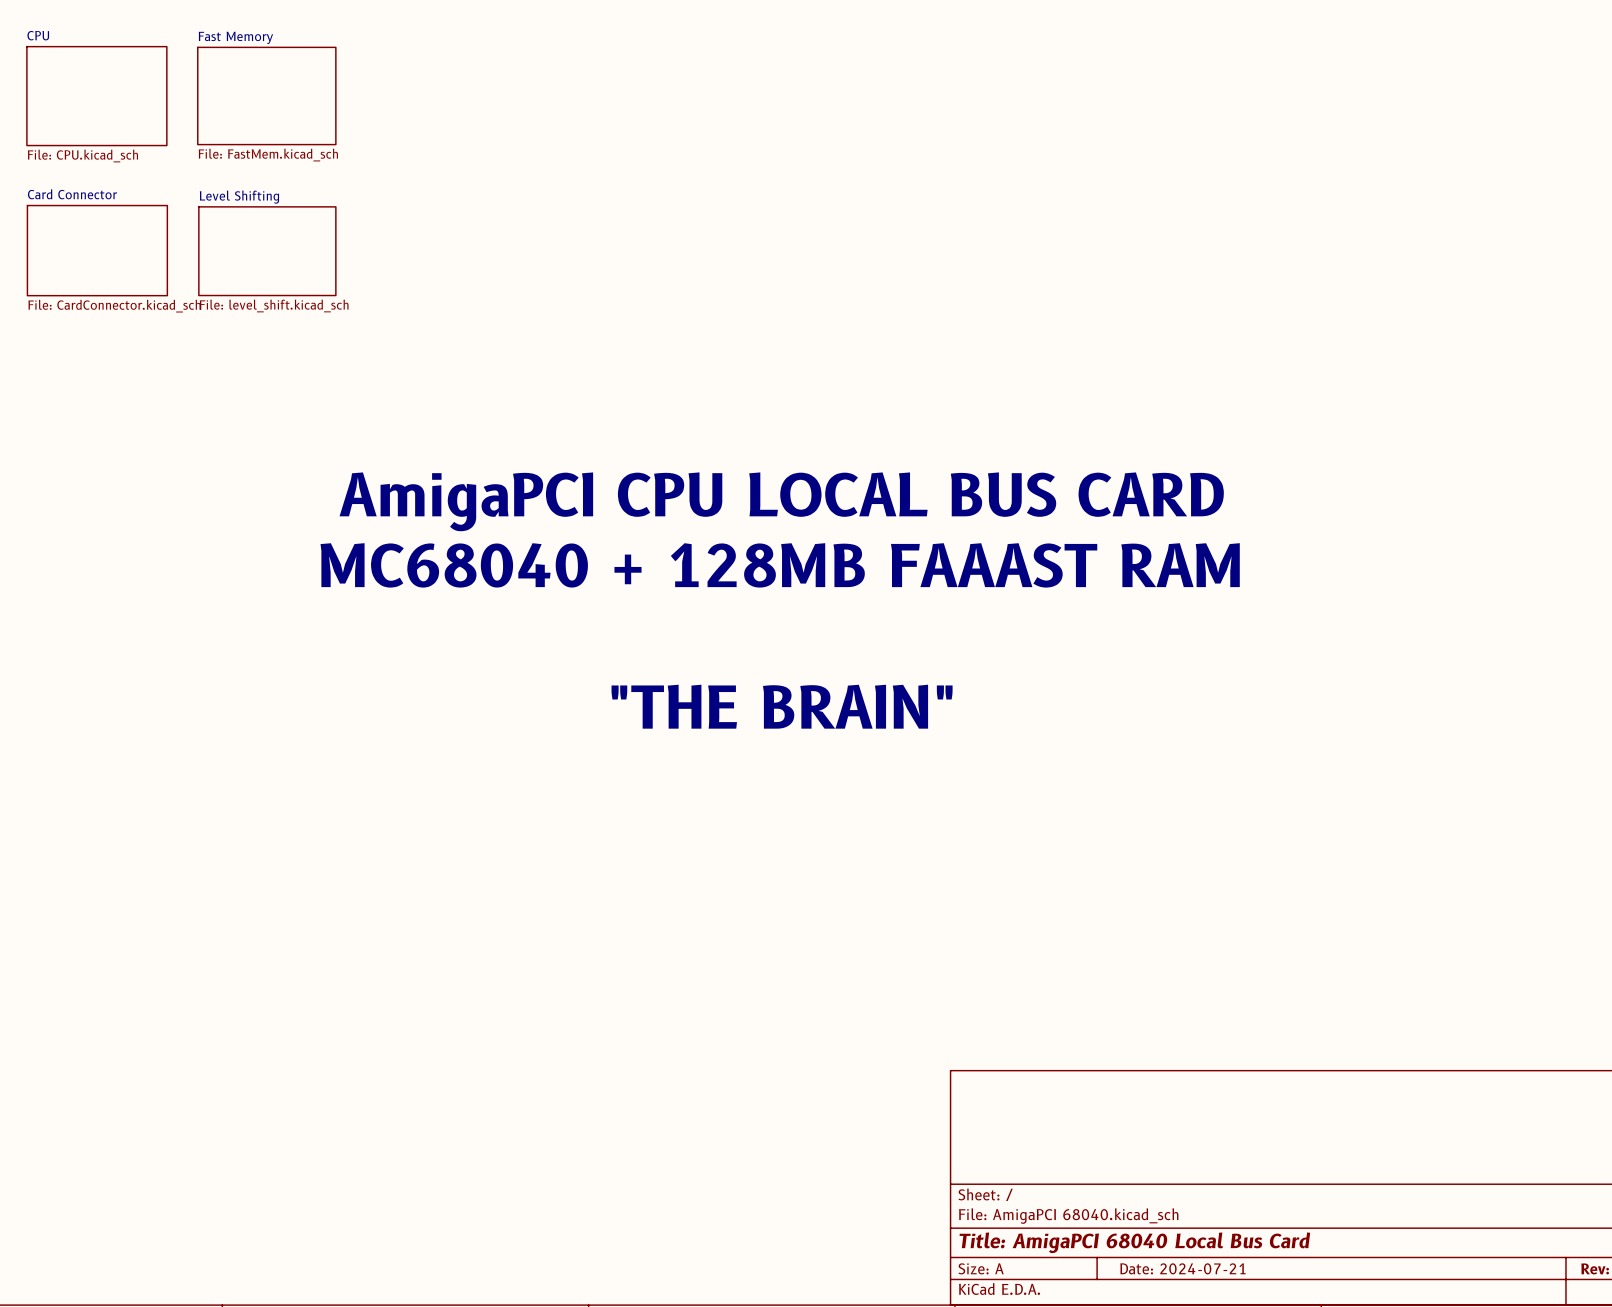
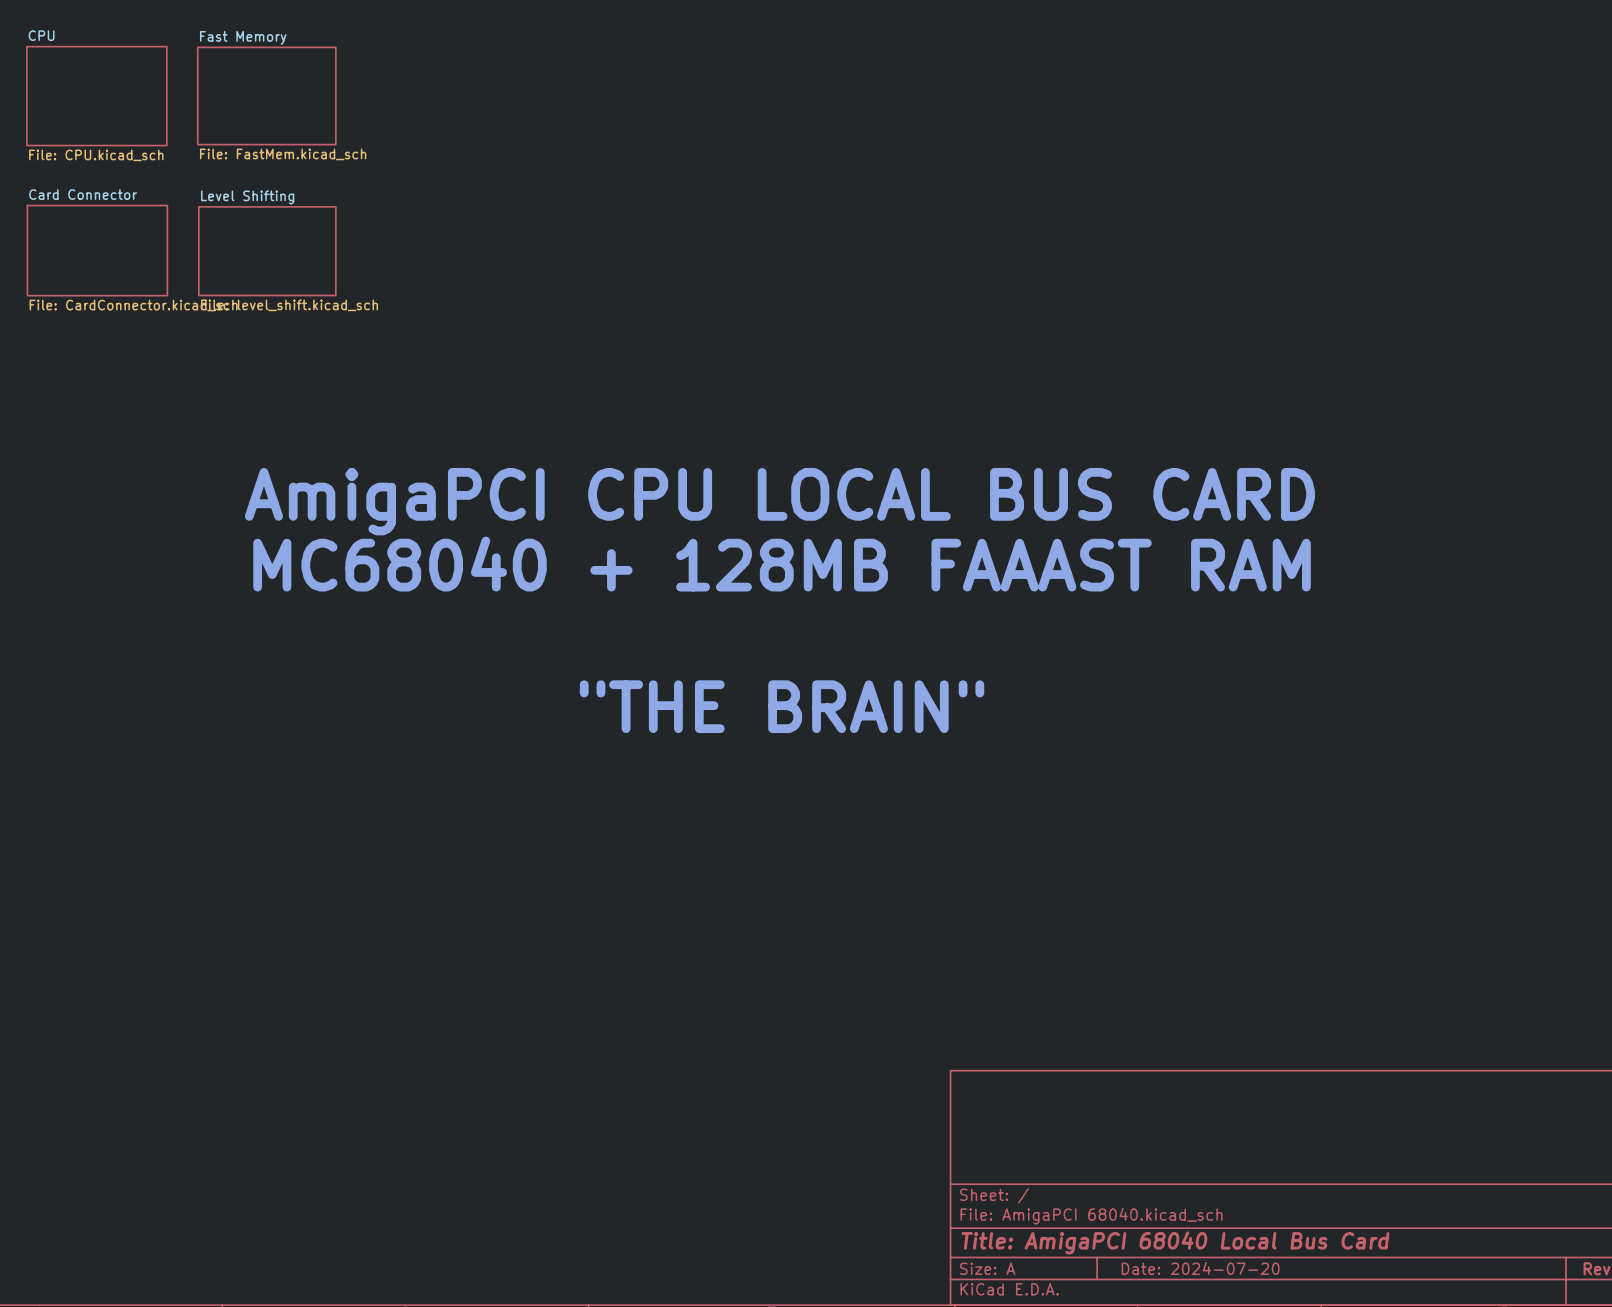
title block: Date: 2024-07-21 (1182, 1268) -> Date: 2024-07-20 (1200, 1268)

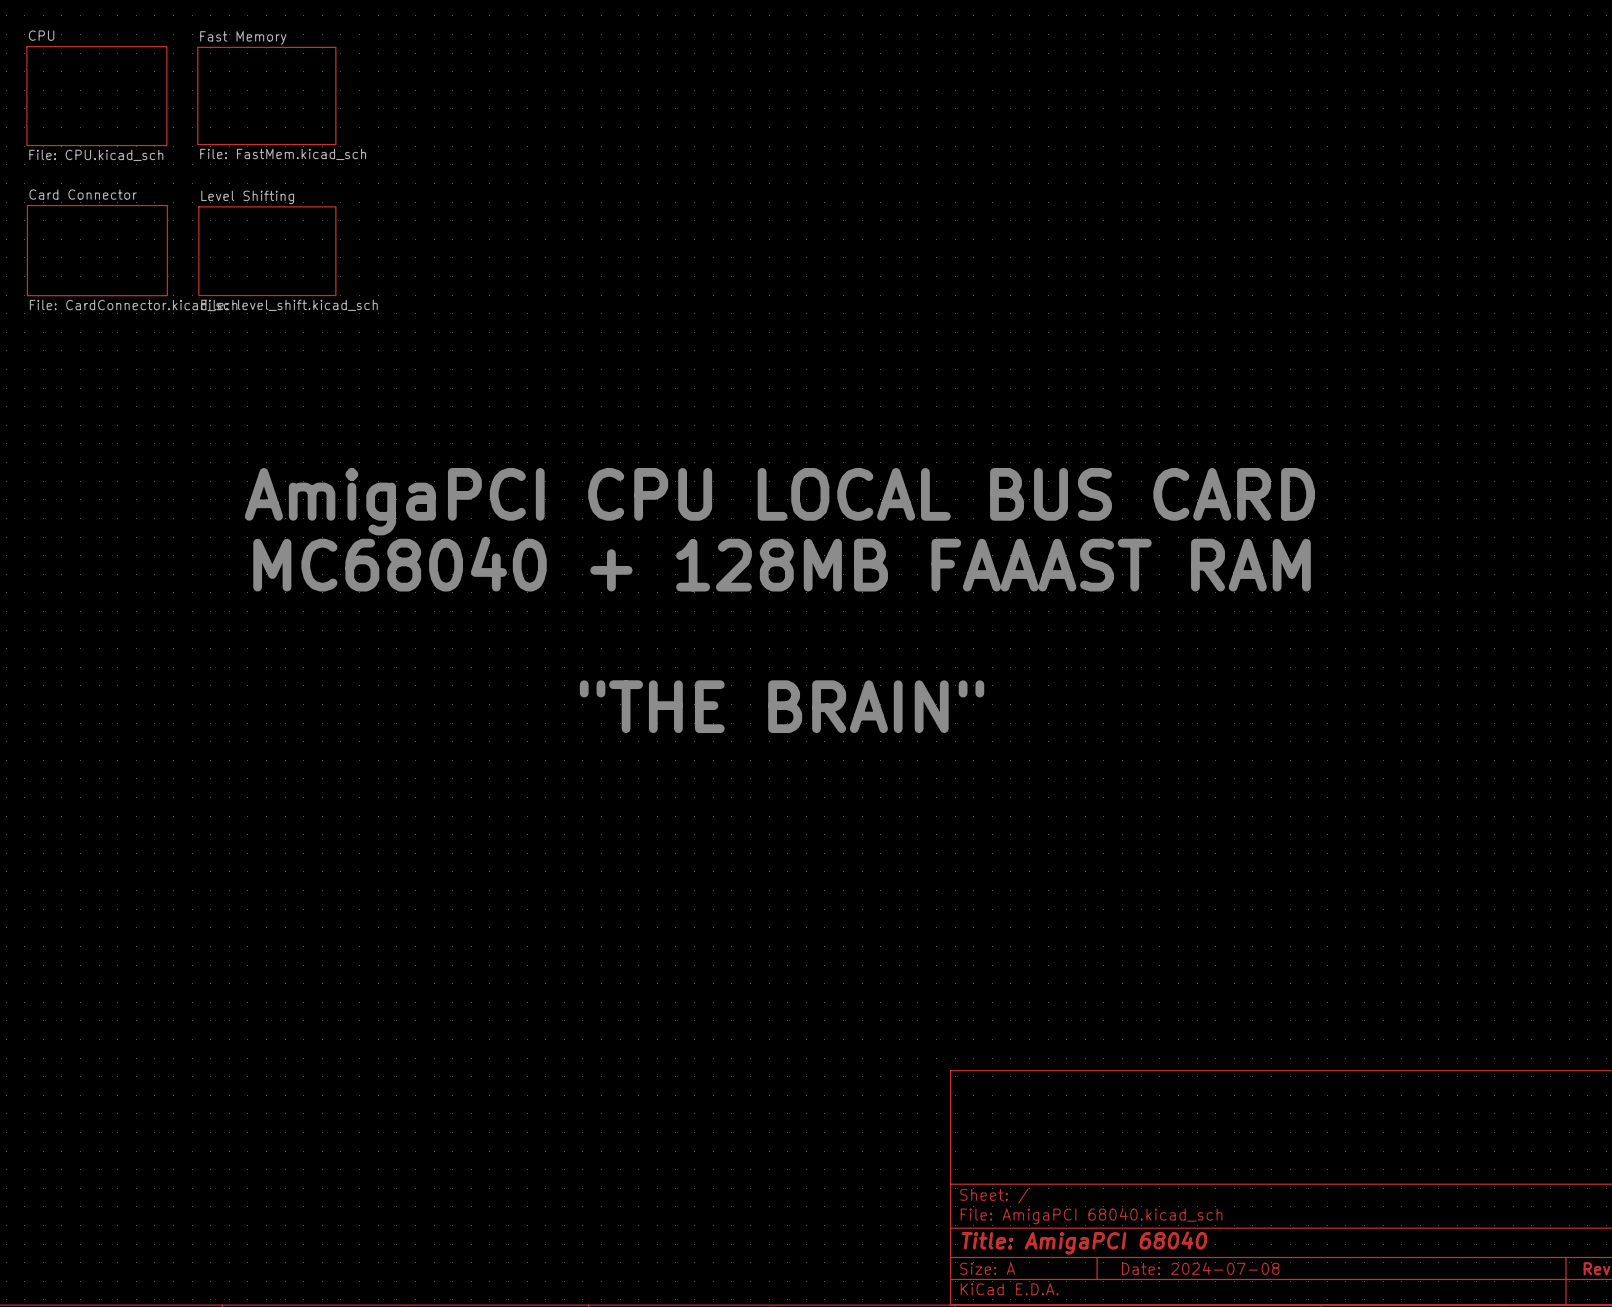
title block: Title: AmigaPCI 68040 Local Bus Card (1175, 1242) -> Title: AmigaPCI 68040 (1084, 1242)
title block: Date: 2024-07-20 (1200, 1268) -> Date: 2024-07-08 (1200, 1268)

